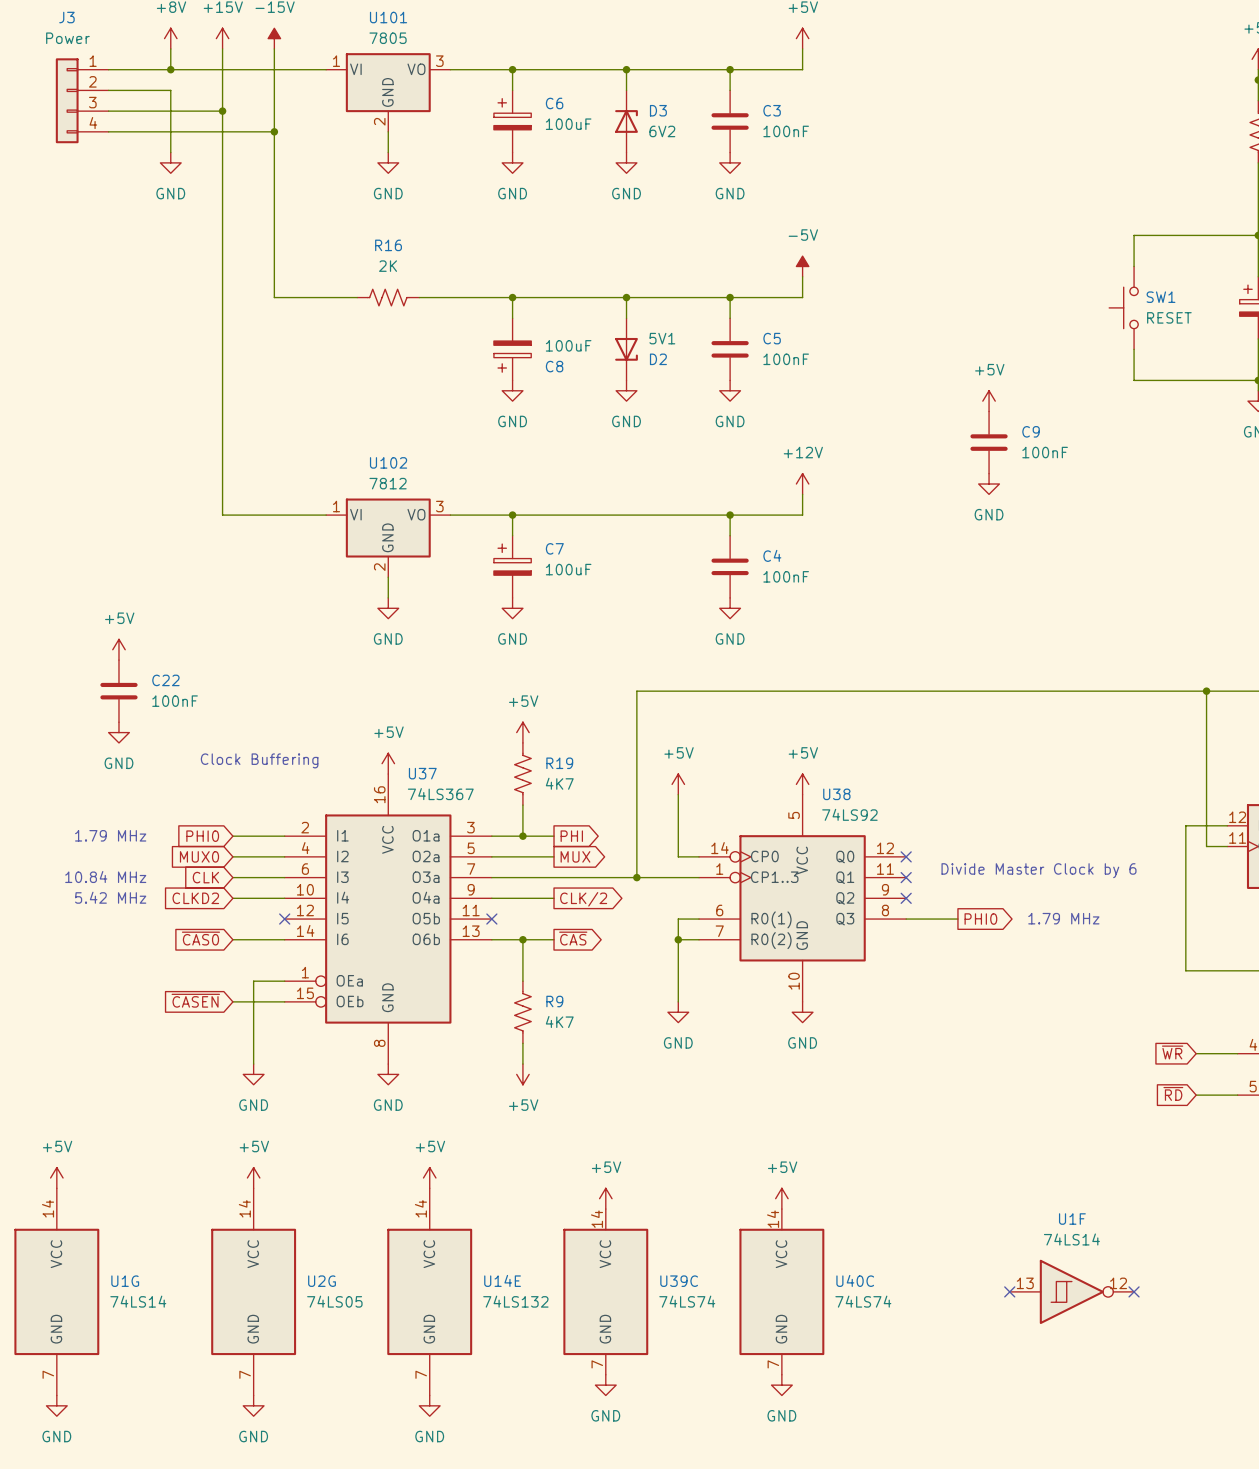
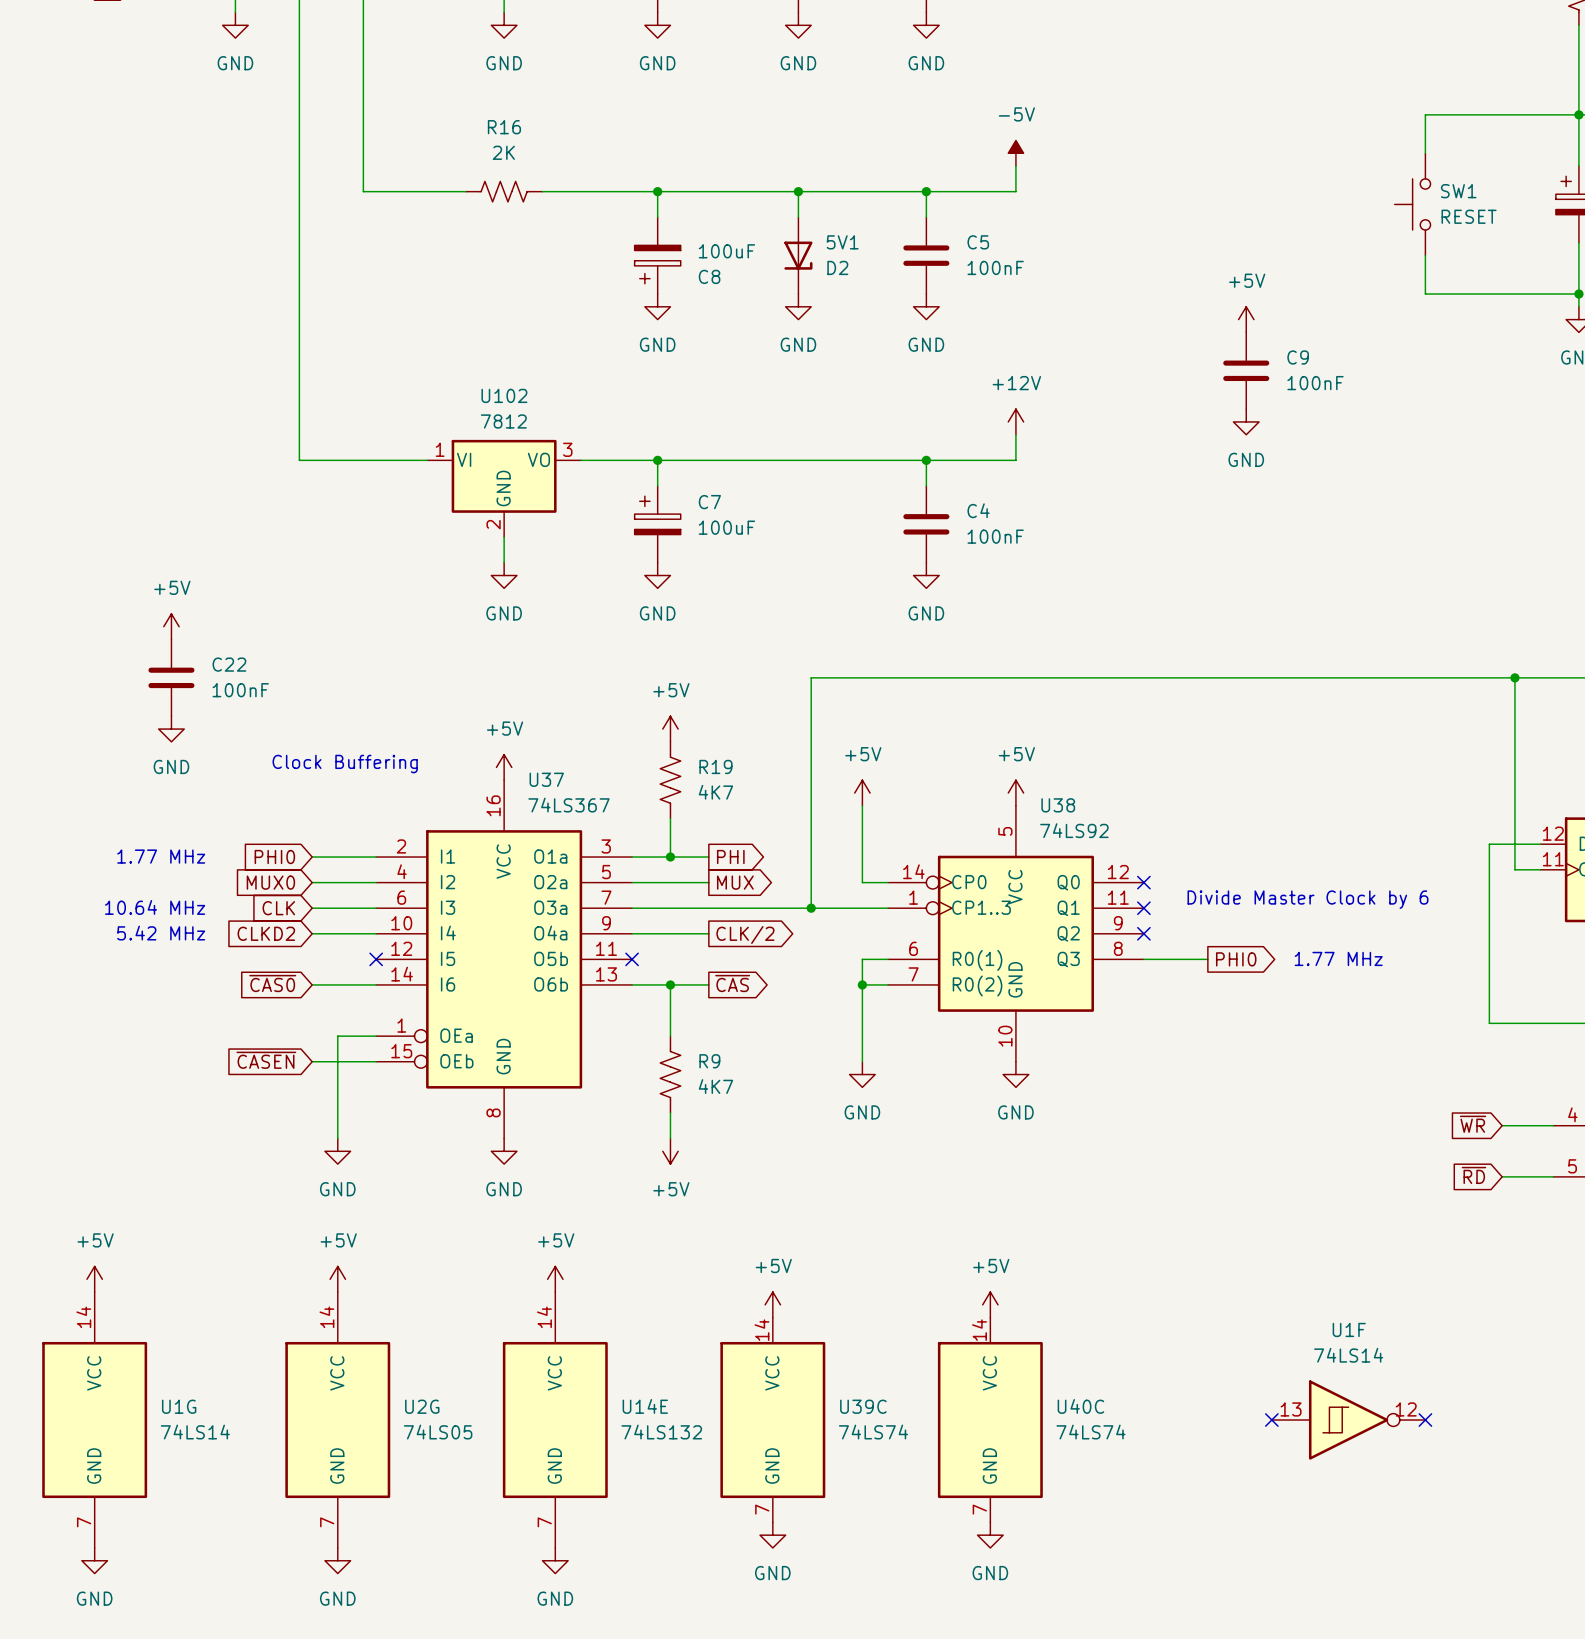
text: 1.79 MHz (110, 835) -> 1.77 MHz (161, 856)
text: 10.84 MHz (105, 877) -> 10.64 MHz (155, 907)
text: 1.79 MHz (1063, 918) -> 1.77 MHz (1338, 958)

